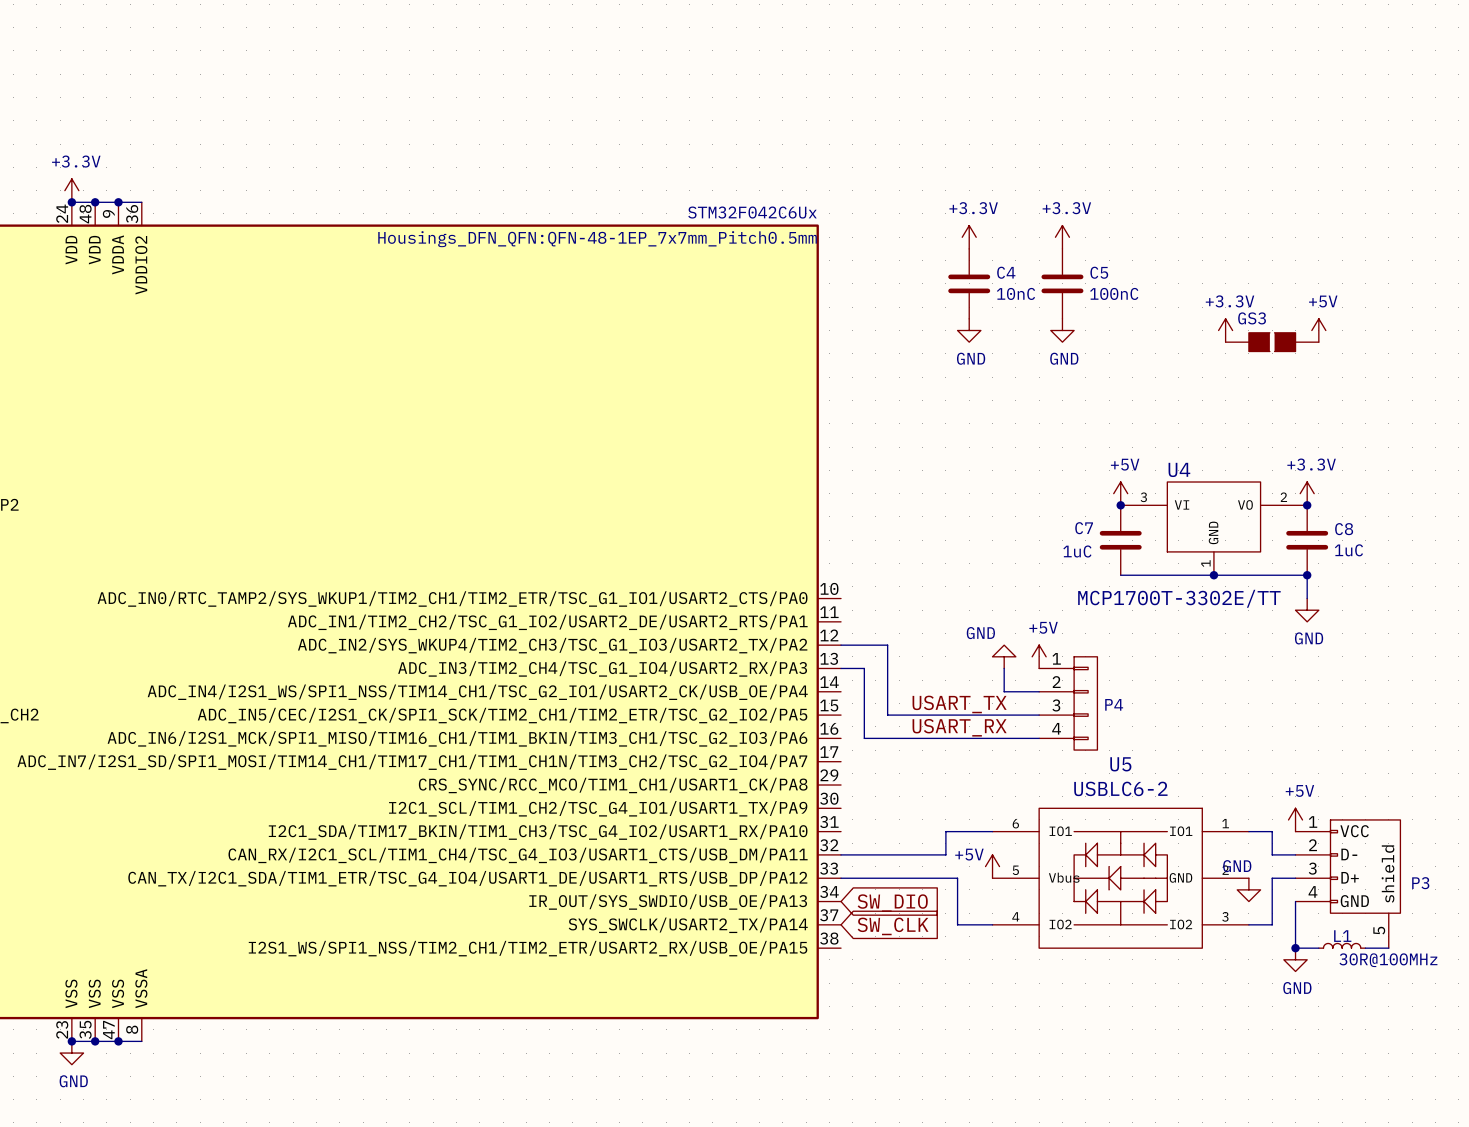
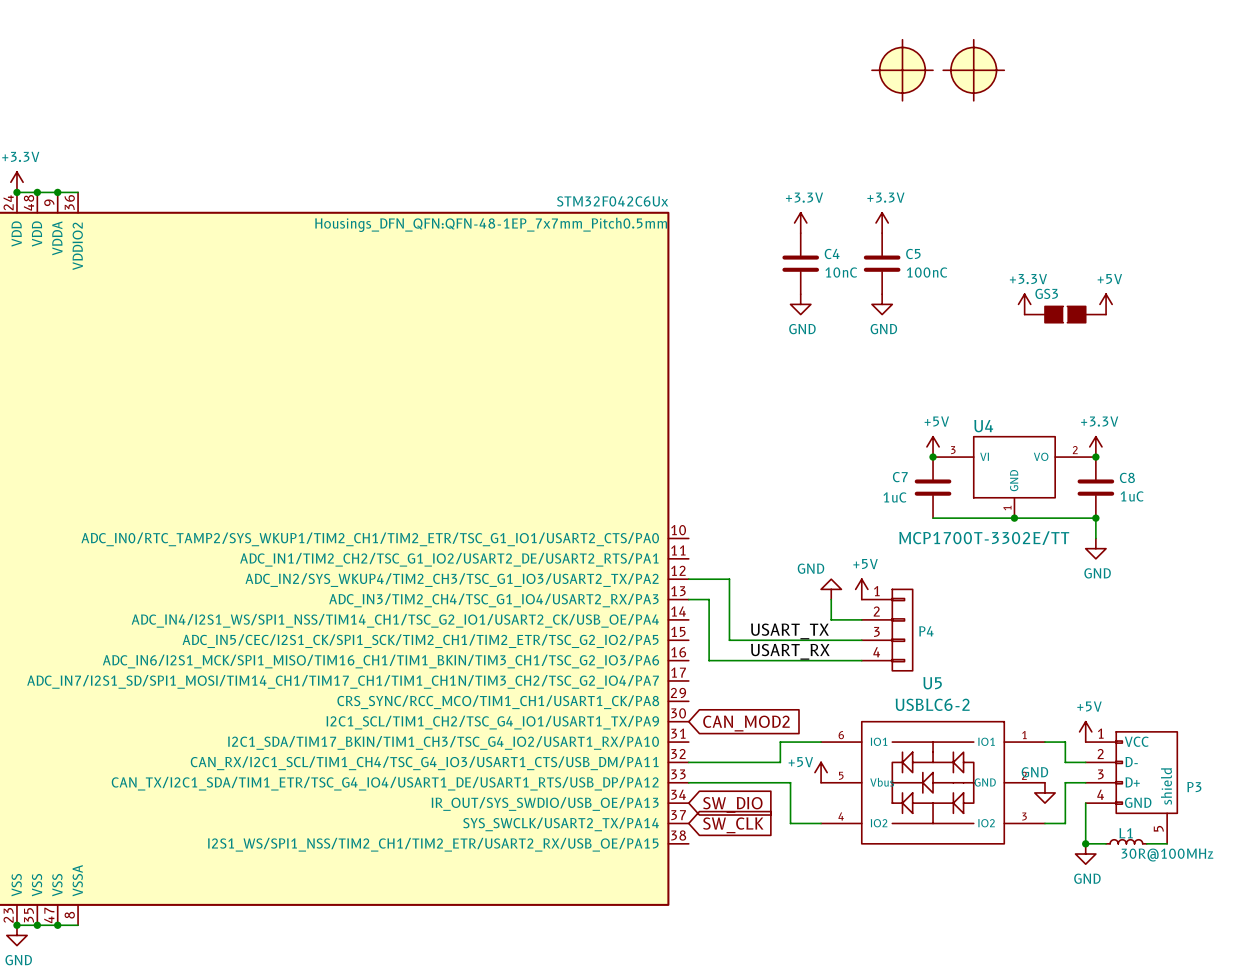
part: none -> (902, 70)
part: none -> (973, 70)
global label: none -> CAN_MOD2 (746, 723)

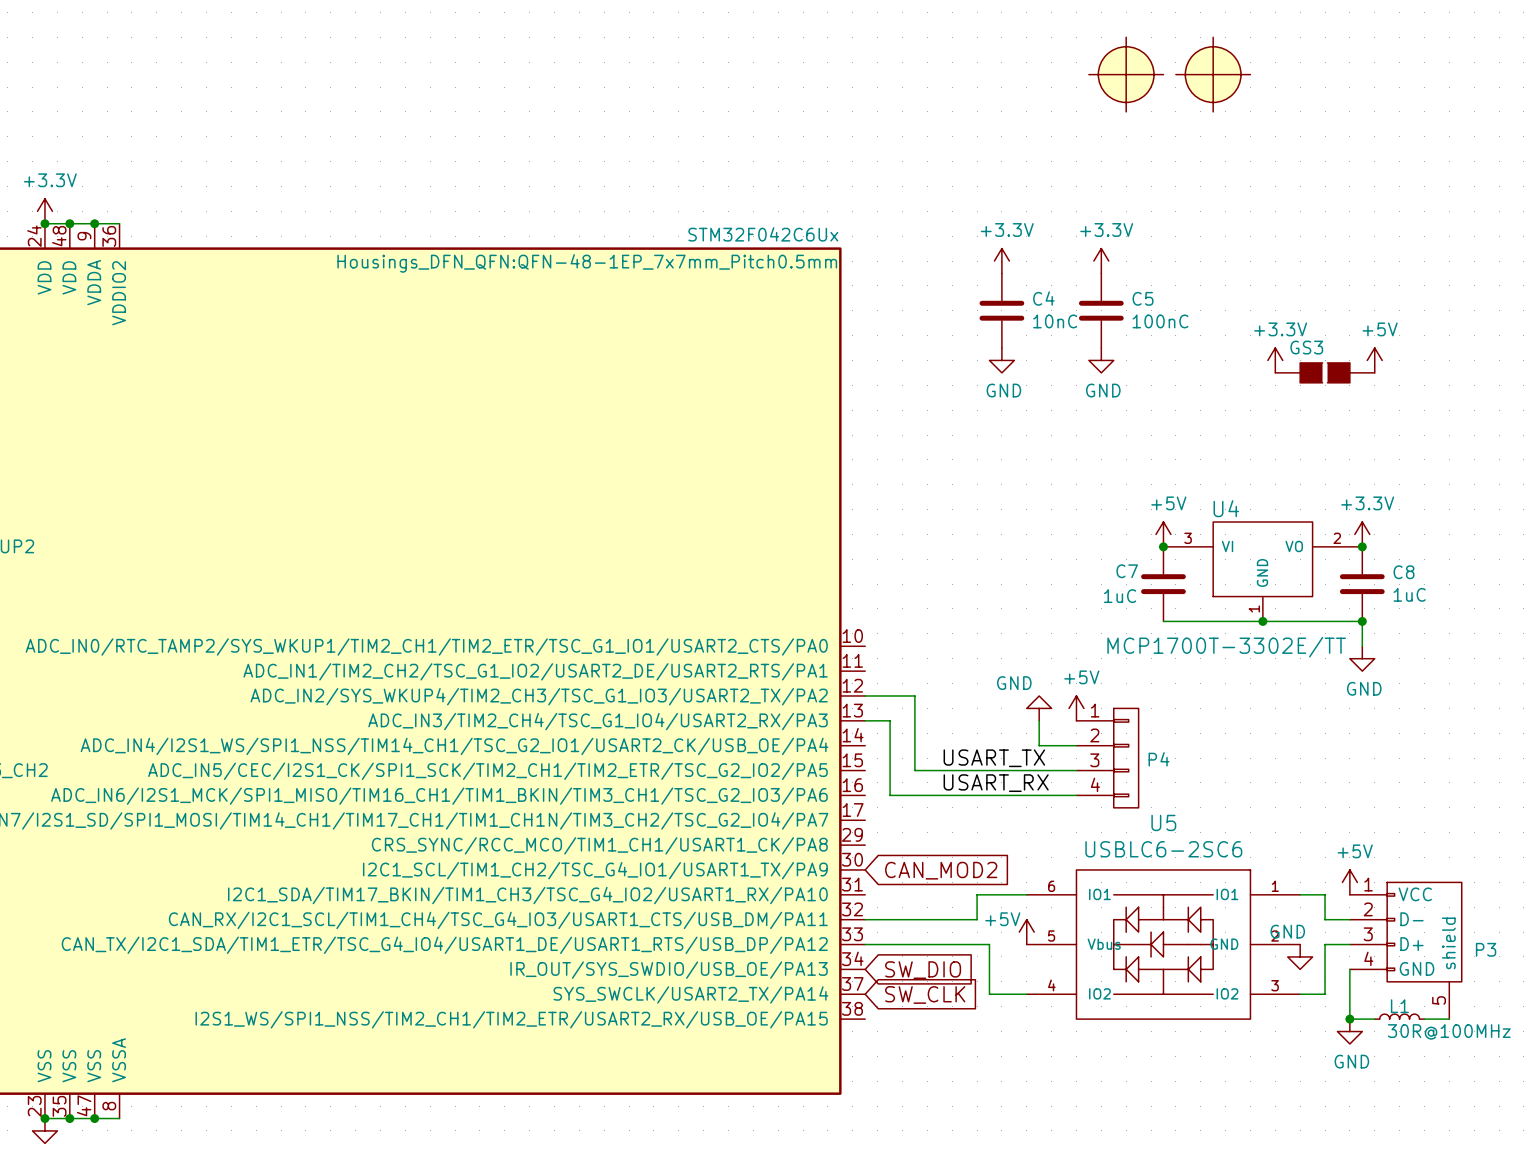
U5 value: USBLC6-2 (932, 704) -> USBLC6-2SC6 (1163, 849)

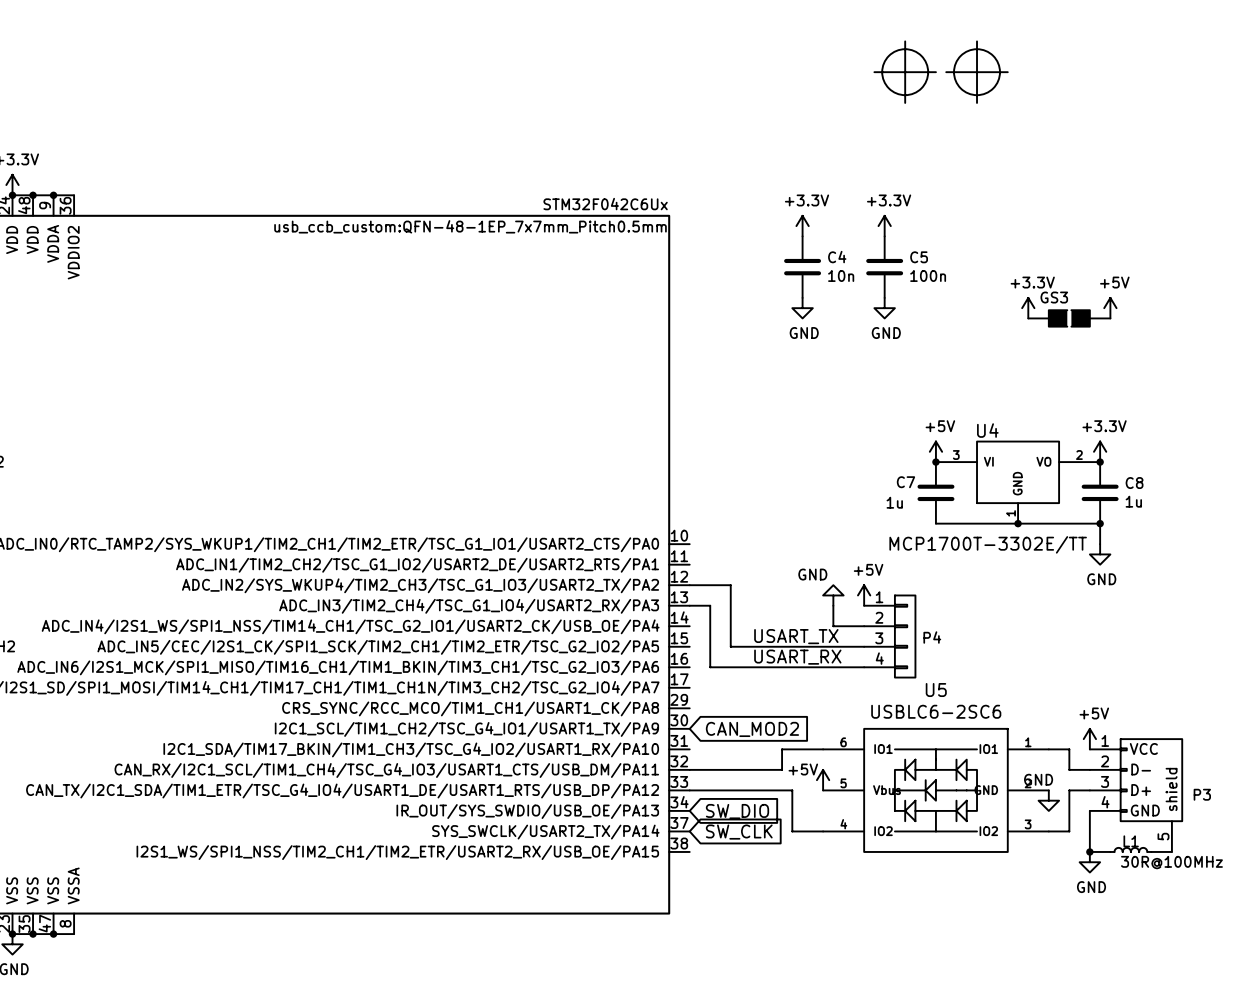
part text: Housings_DFN_QFN:QFN-48-1EP_7x7mm_Pitch0.5mm (587, 263) -> usb_ccb_custom:QFN-48-1EP_7x7mm_Pitch0.5mm (470, 226)
C4 value: 10nC (1055, 321) -> 10n (841, 275)
C5 value: 100nC (1160, 321) -> 100n (928, 275)
C8 value: 1uC (1409, 594) -> 1u (1133, 501)
C7 value: 1uC (1120, 596) -> 1u (894, 502)

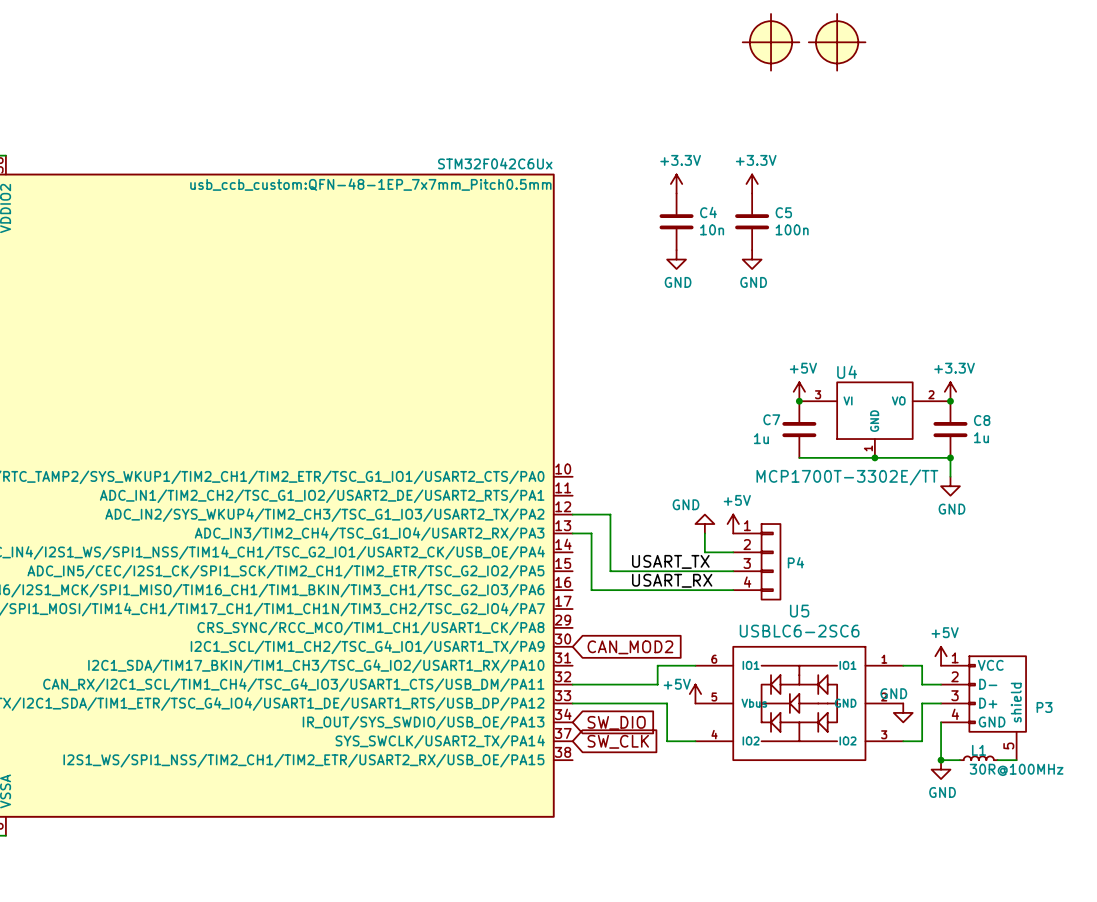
power symbol: +3.3V (1028, 308) -> none
power symbol: +5V (1110, 308) -> none
GS3: (1069, 318) -> none

